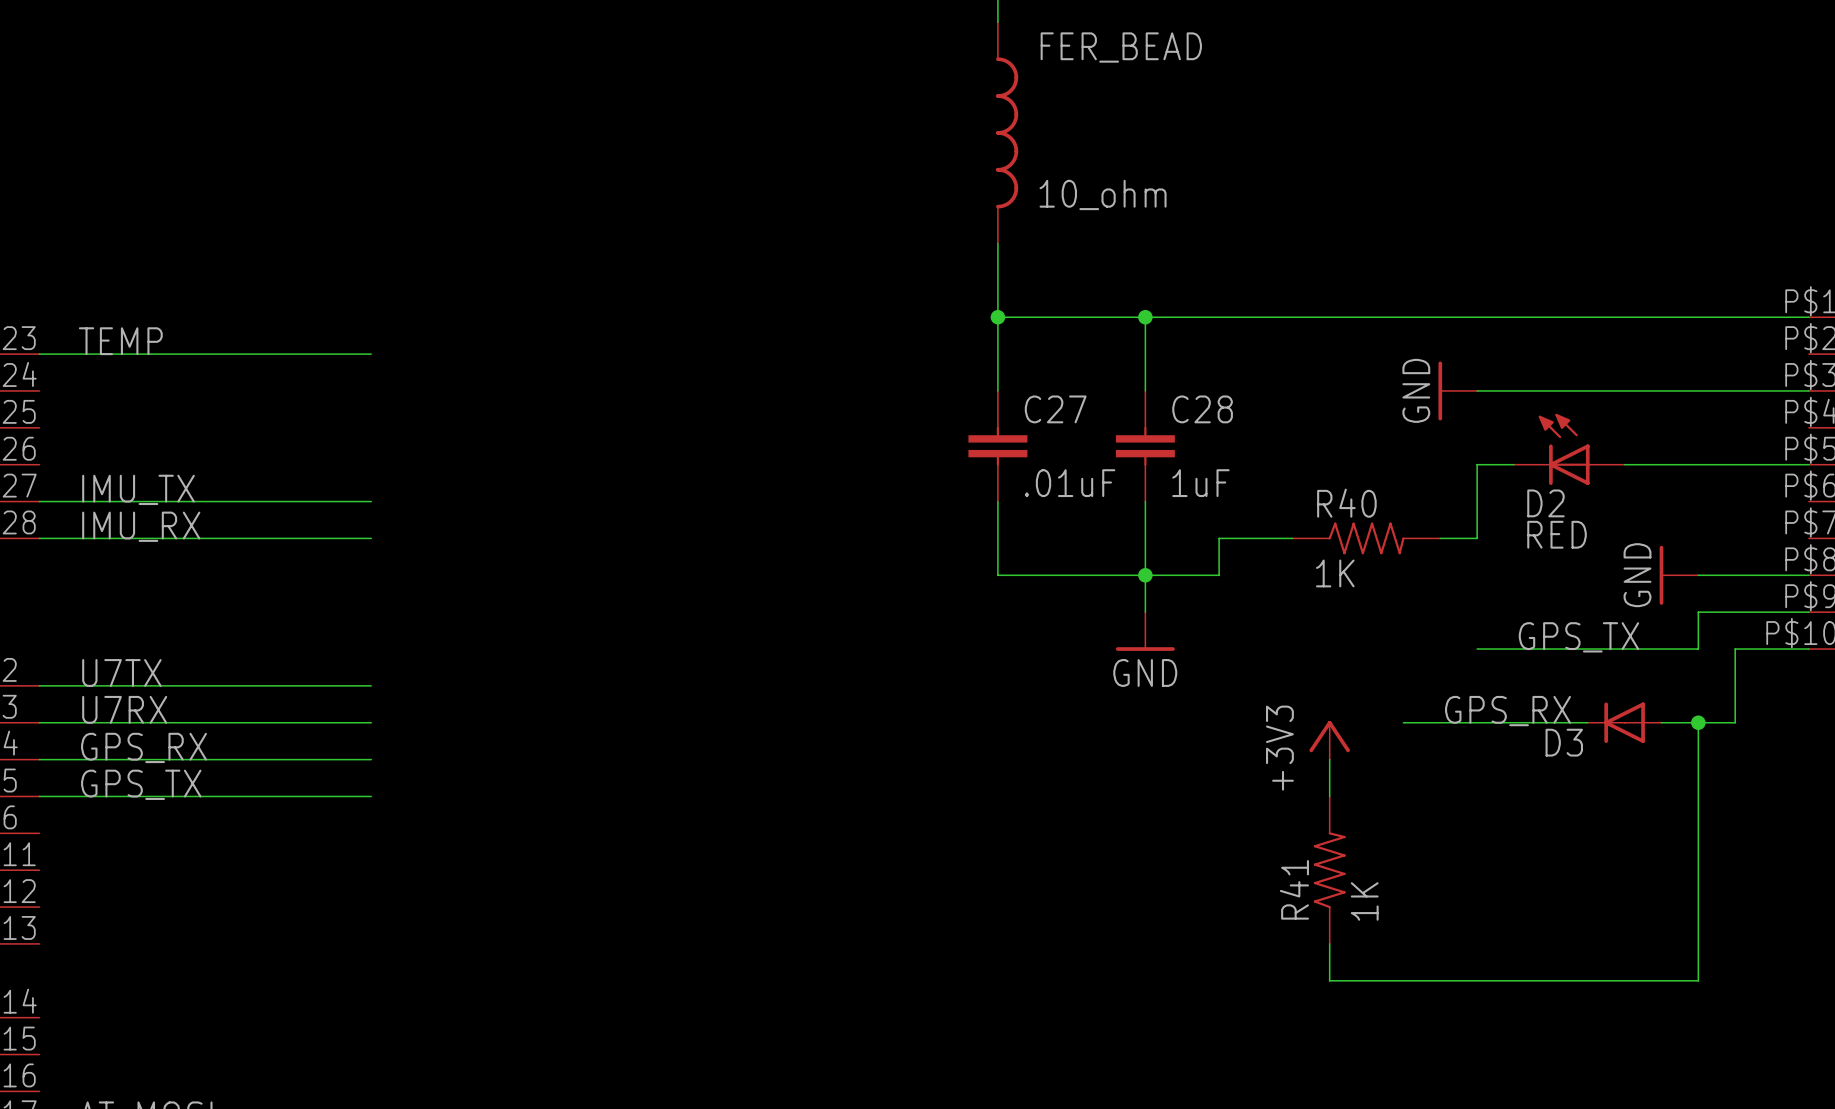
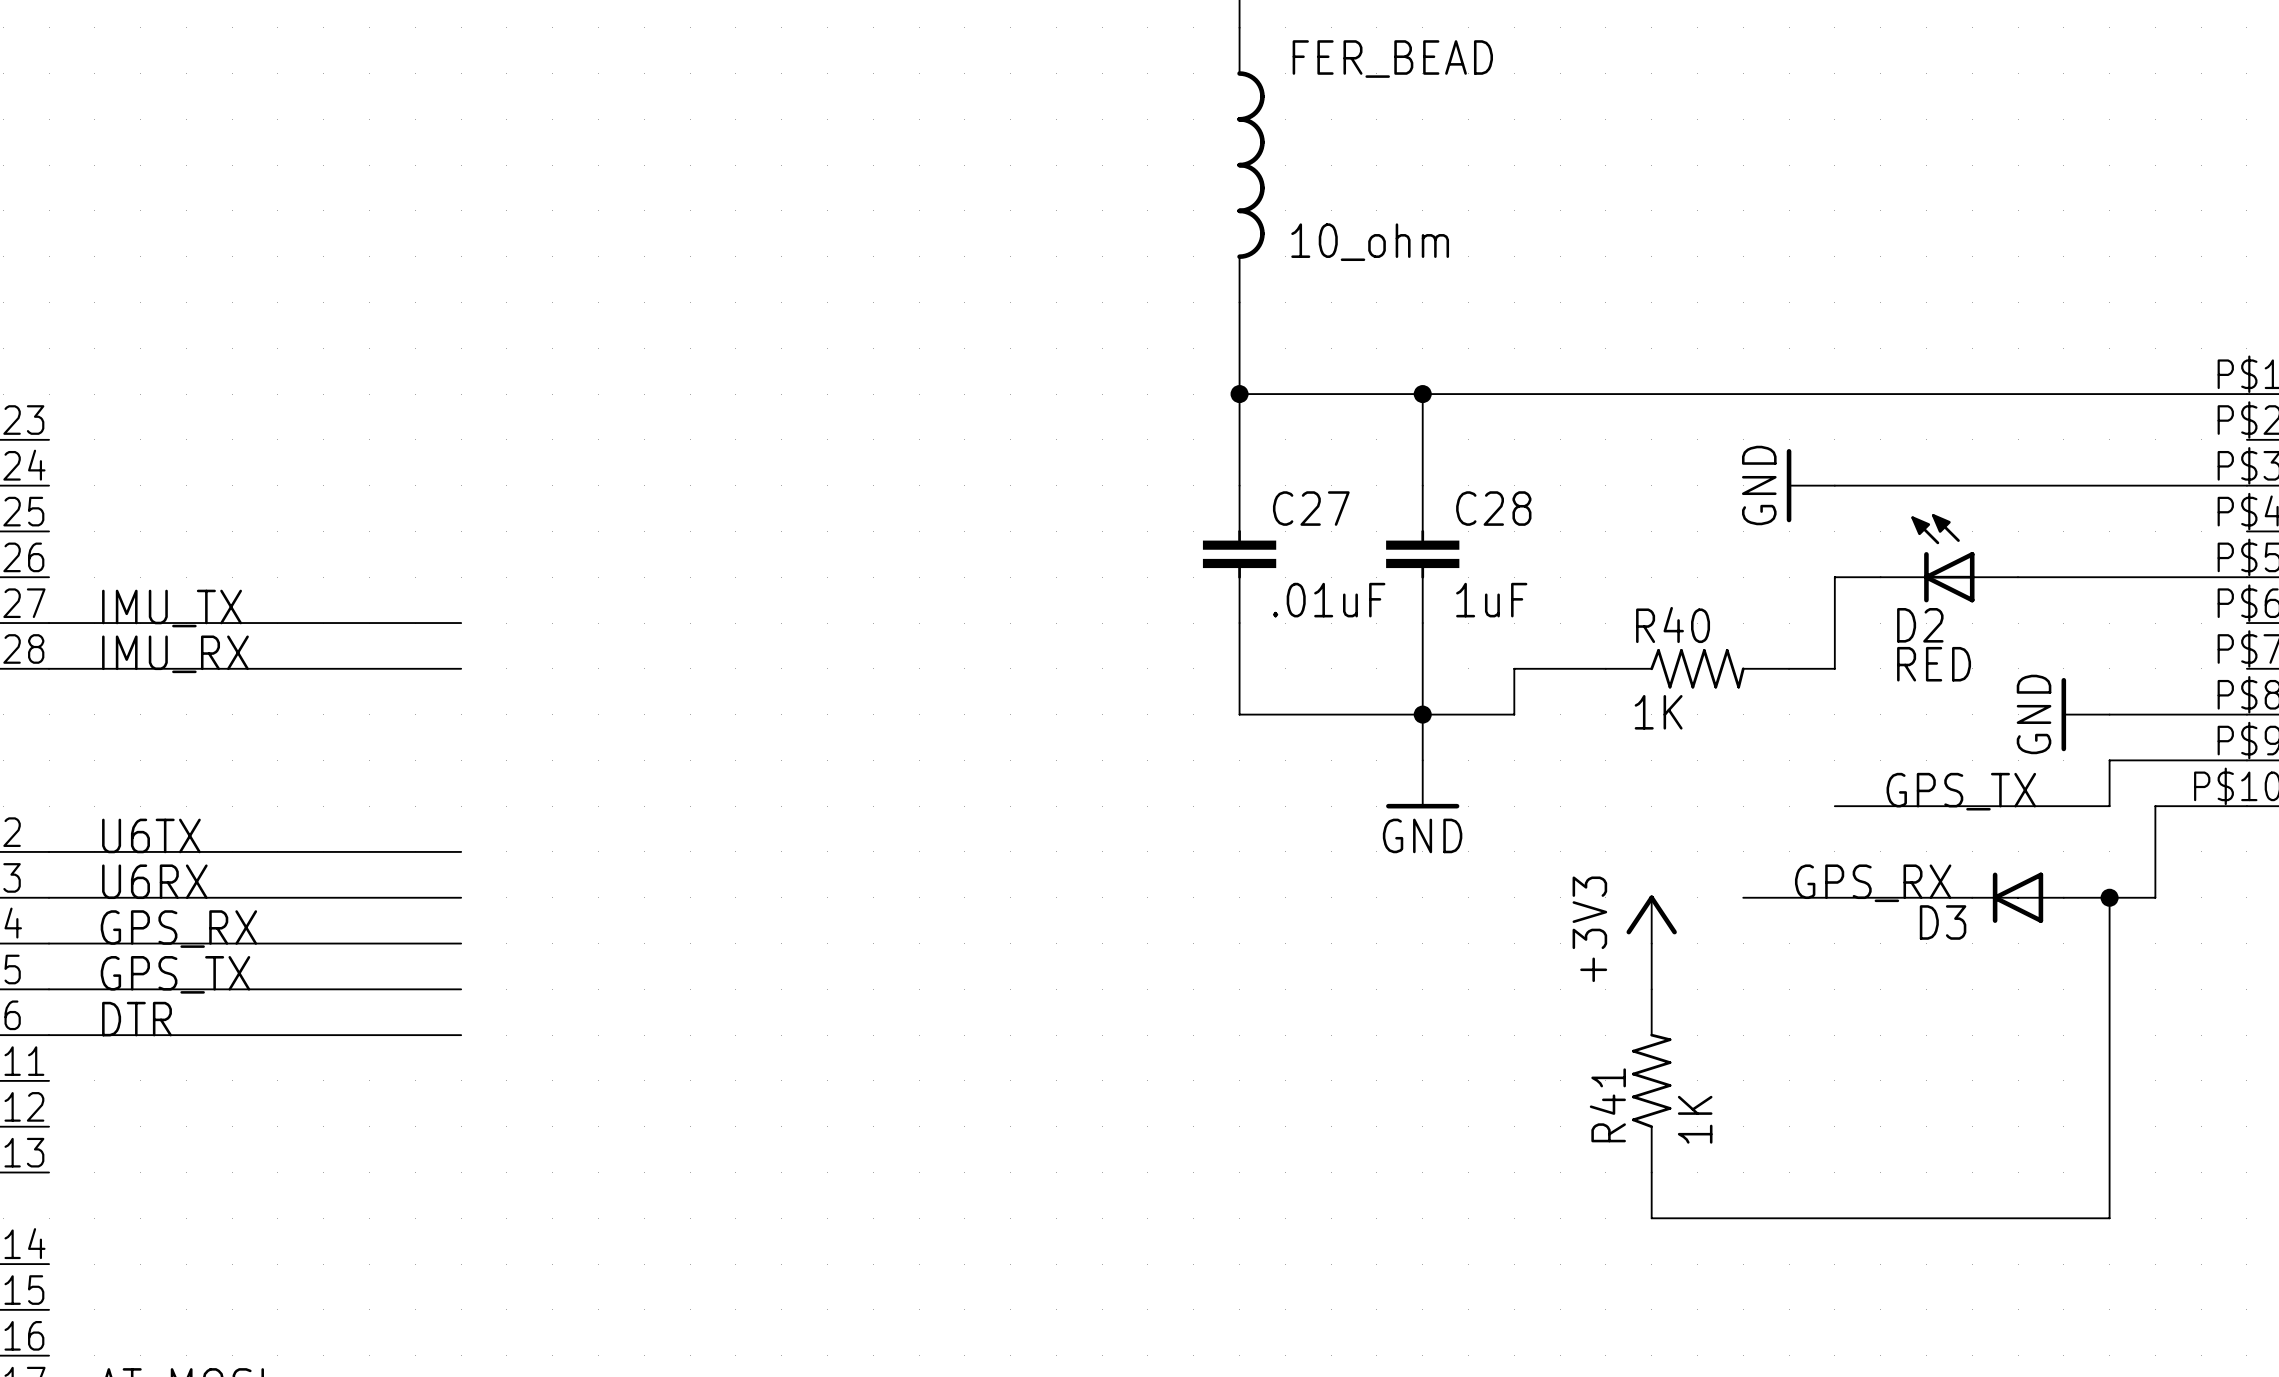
label: TEMP (120, 341) -> none
wire: (39, 354) (371, 354) -> none
label: U7TX (121, 672) -> U6TX (151, 835)
label: U7RX (124, 709) -> U6RX (154, 881)
label: none -> DTR (137, 1019)
wire: none -> (49, 1035) (461, 1035)

